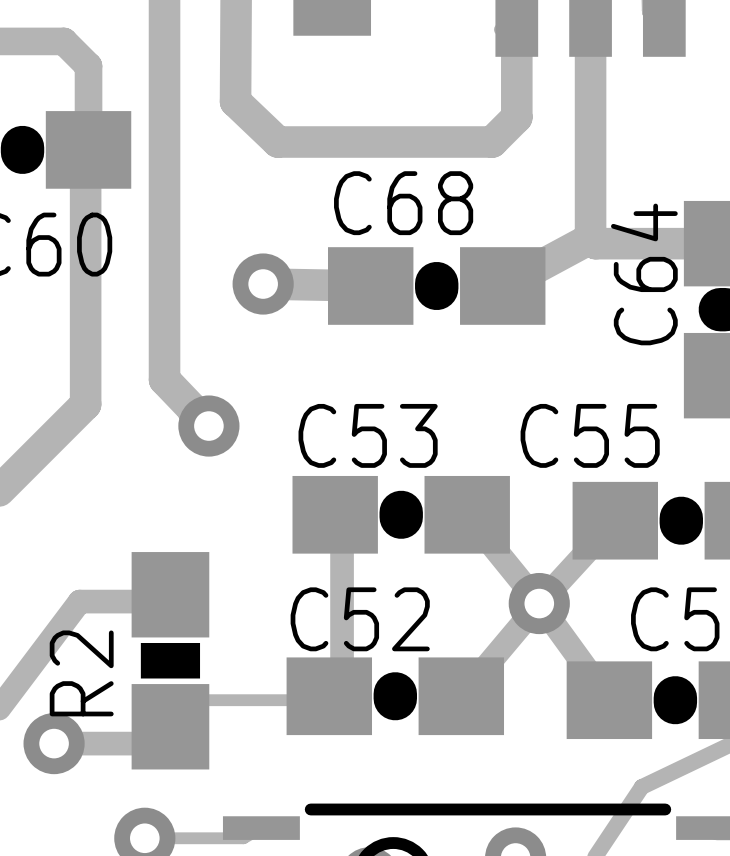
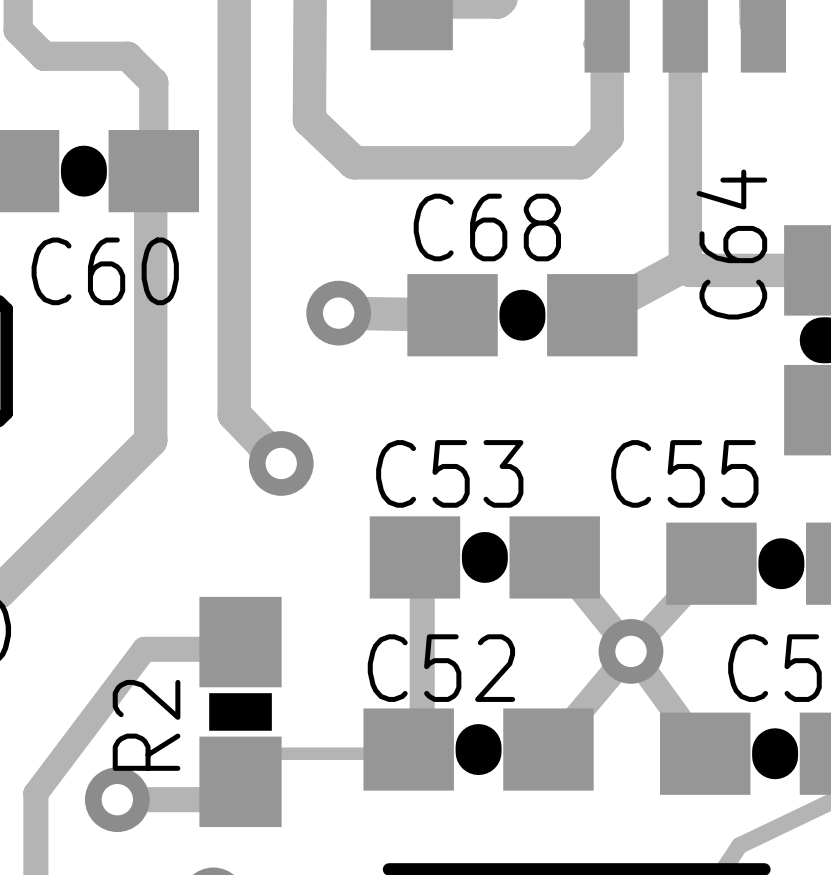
C64 name position: C64 (644, 274) -> C64 (731, 244)

